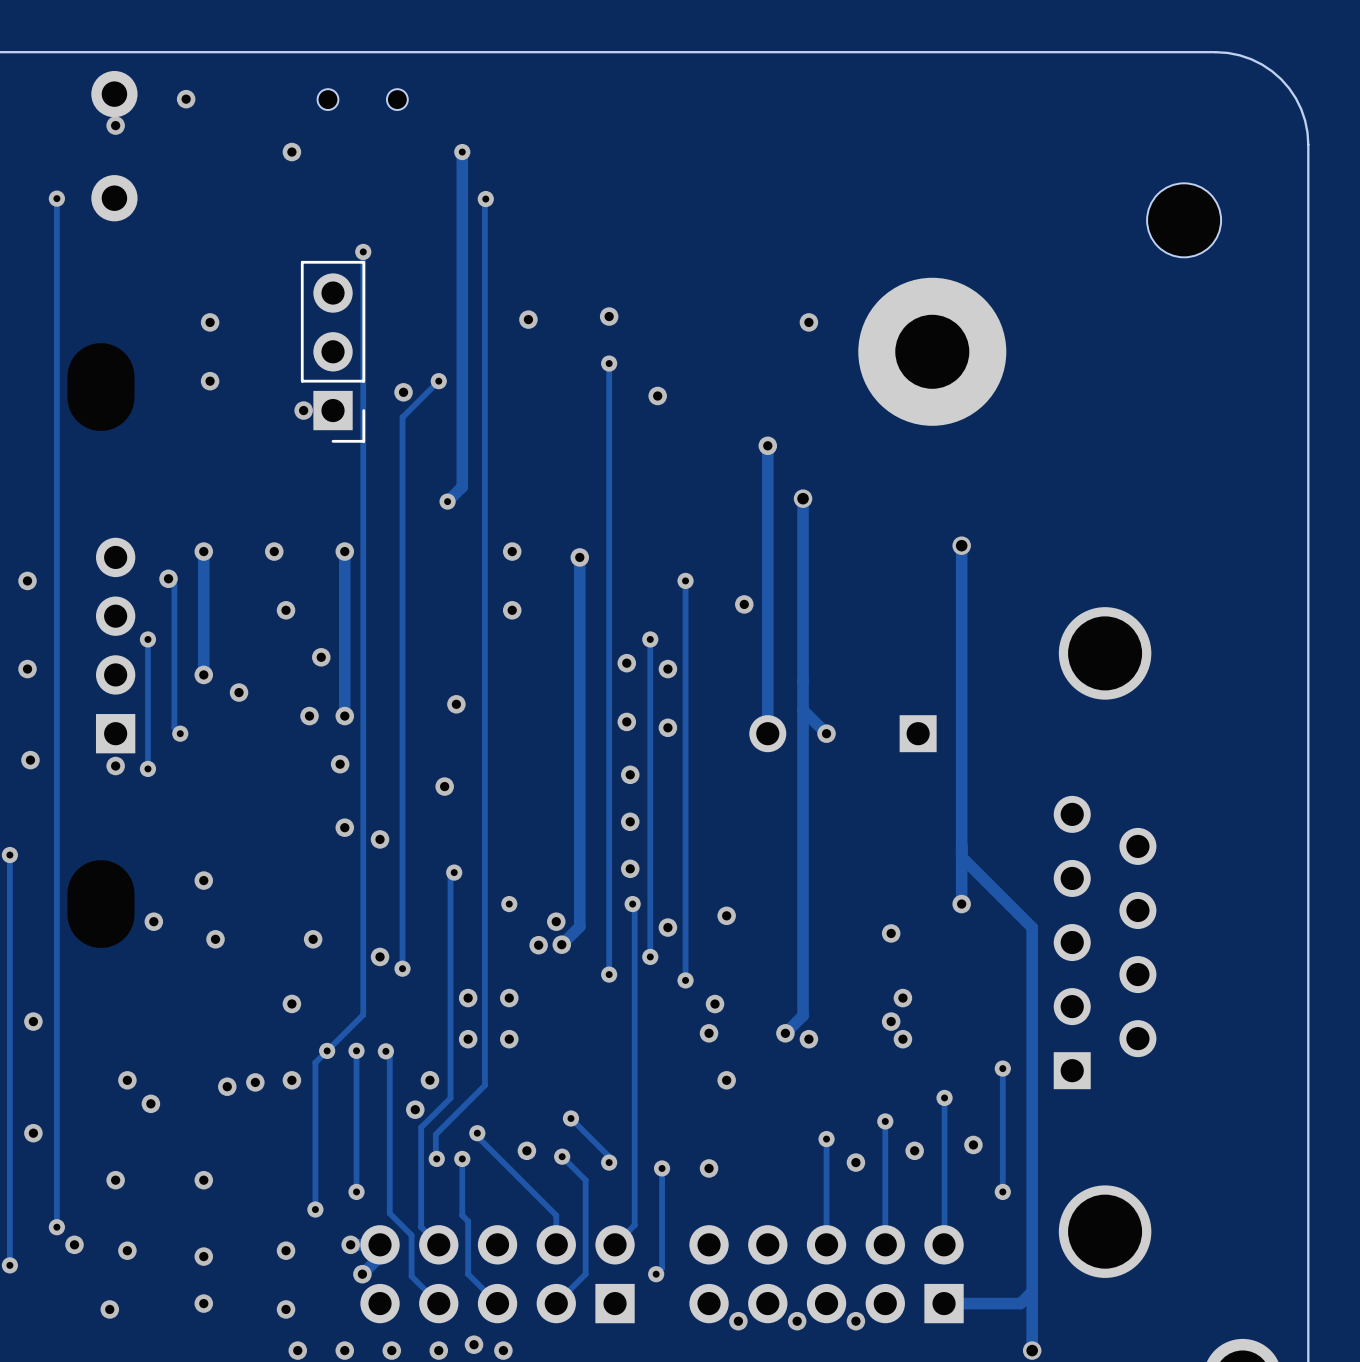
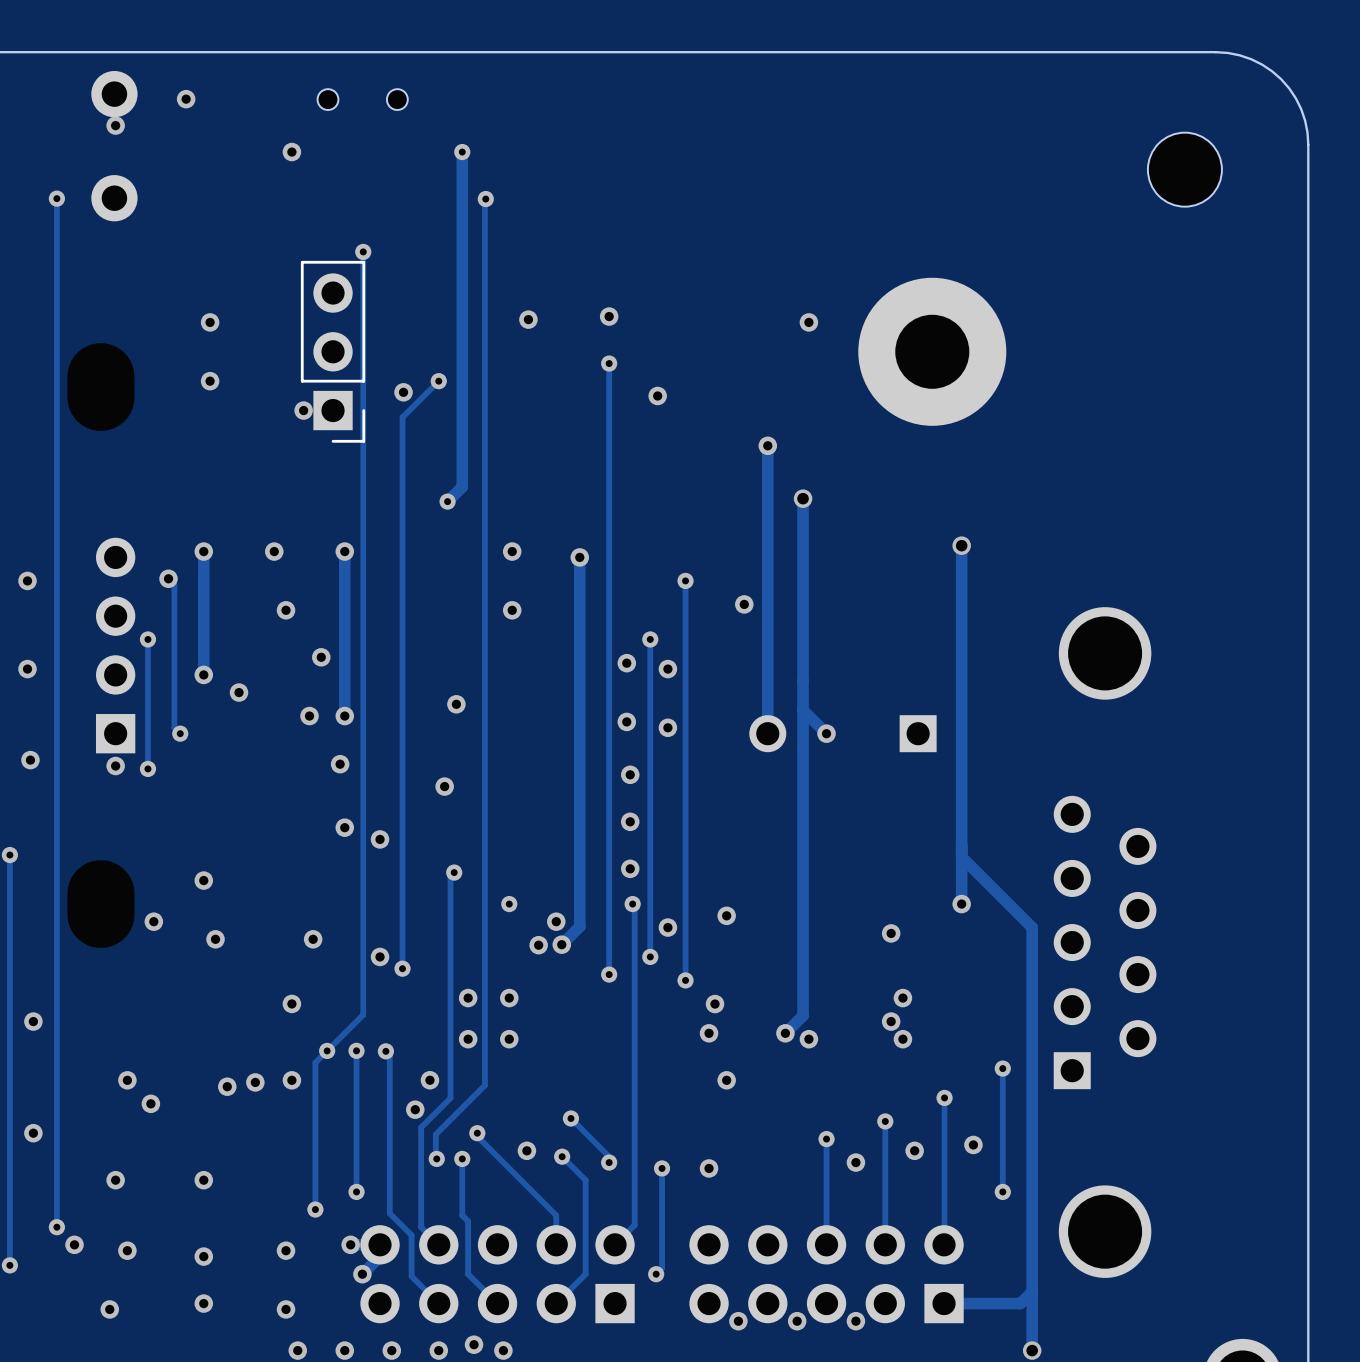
part position: (1184, 220) -> (1184, 169)

